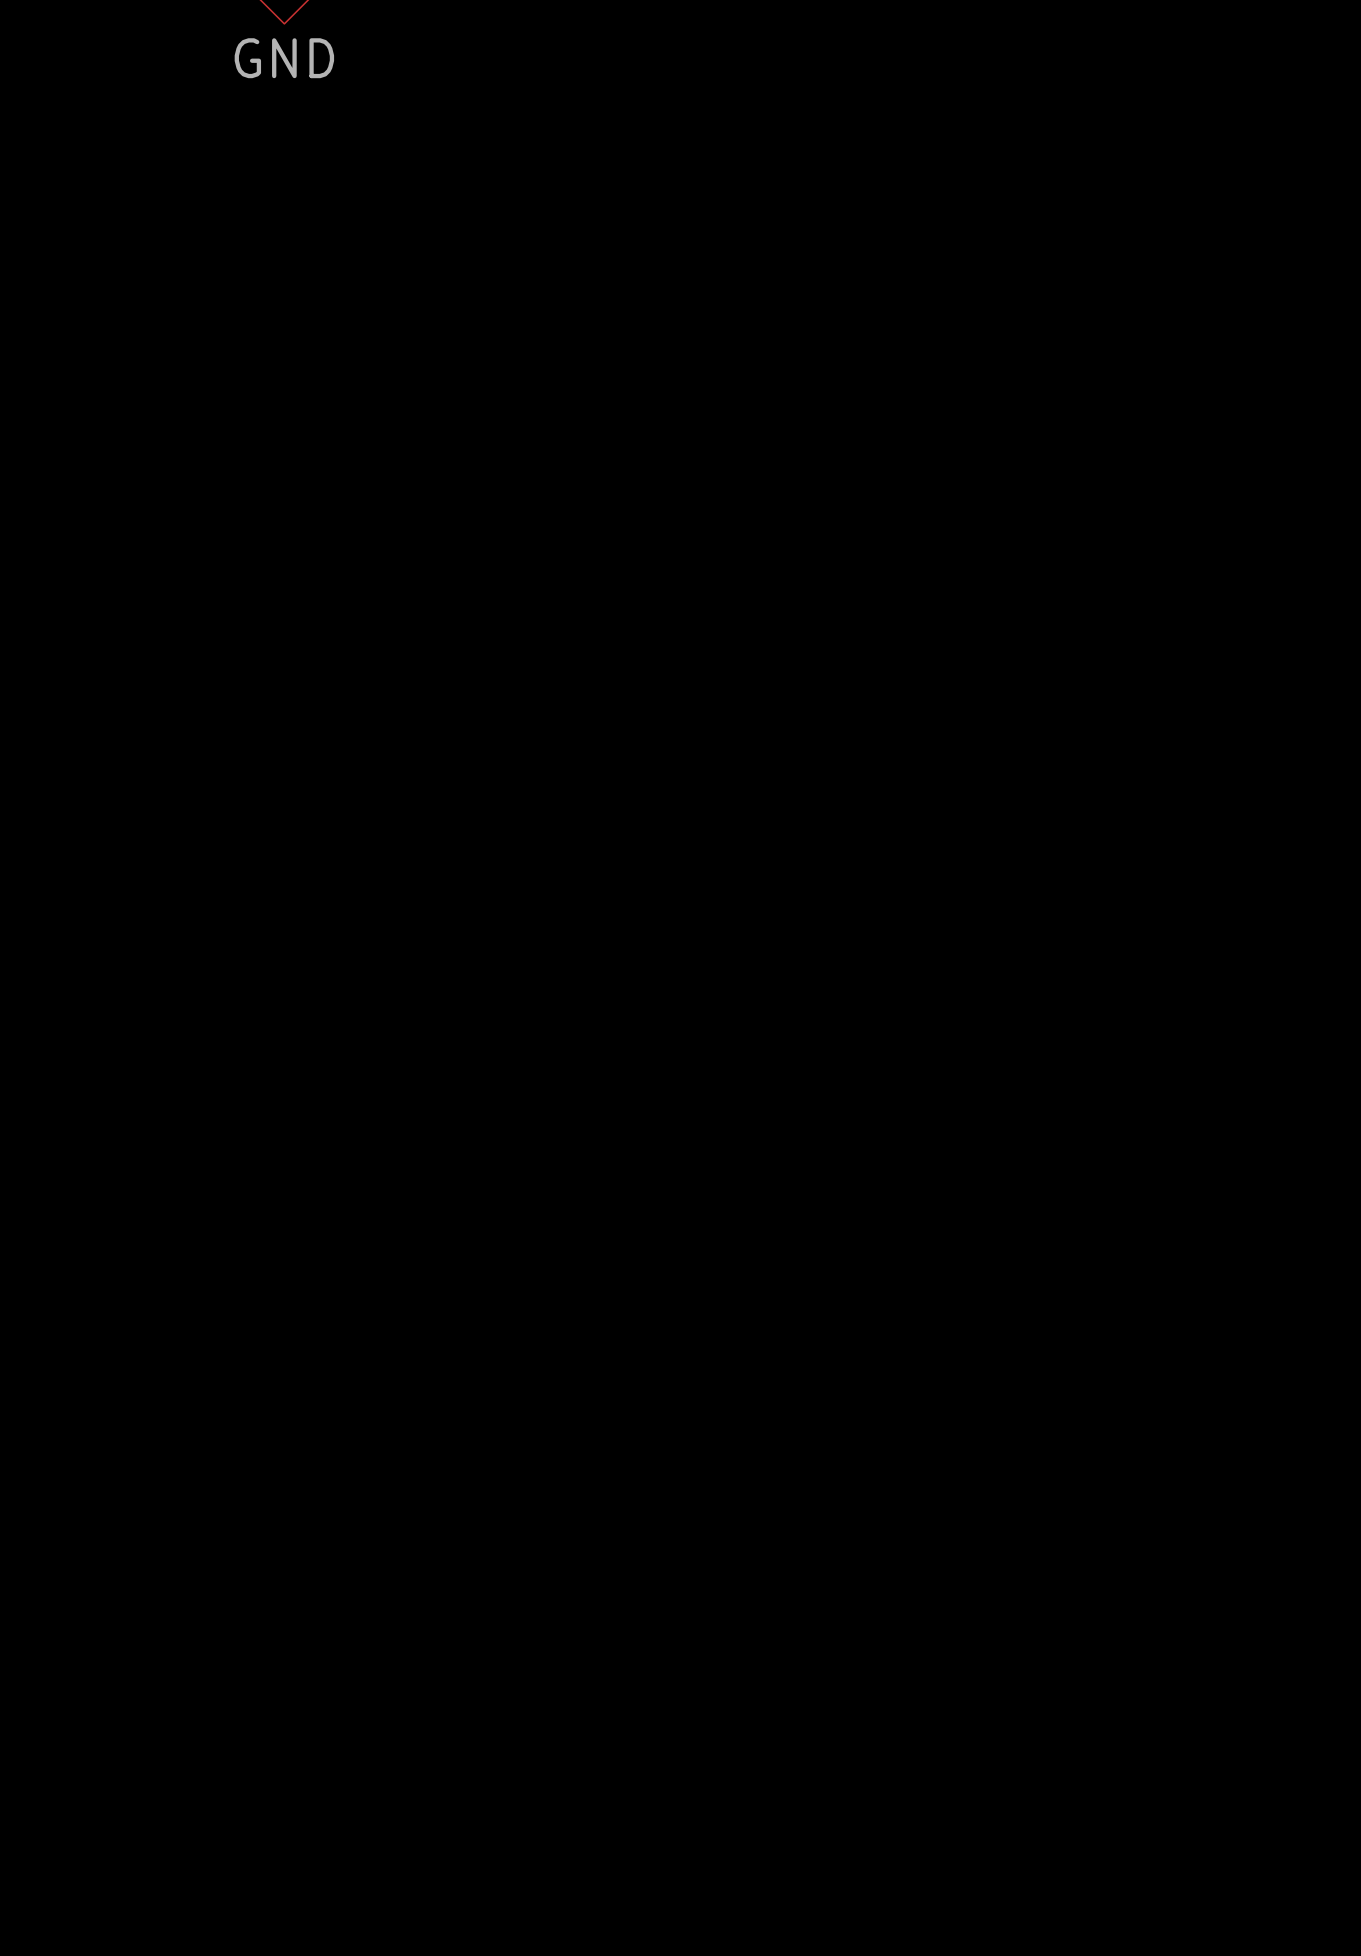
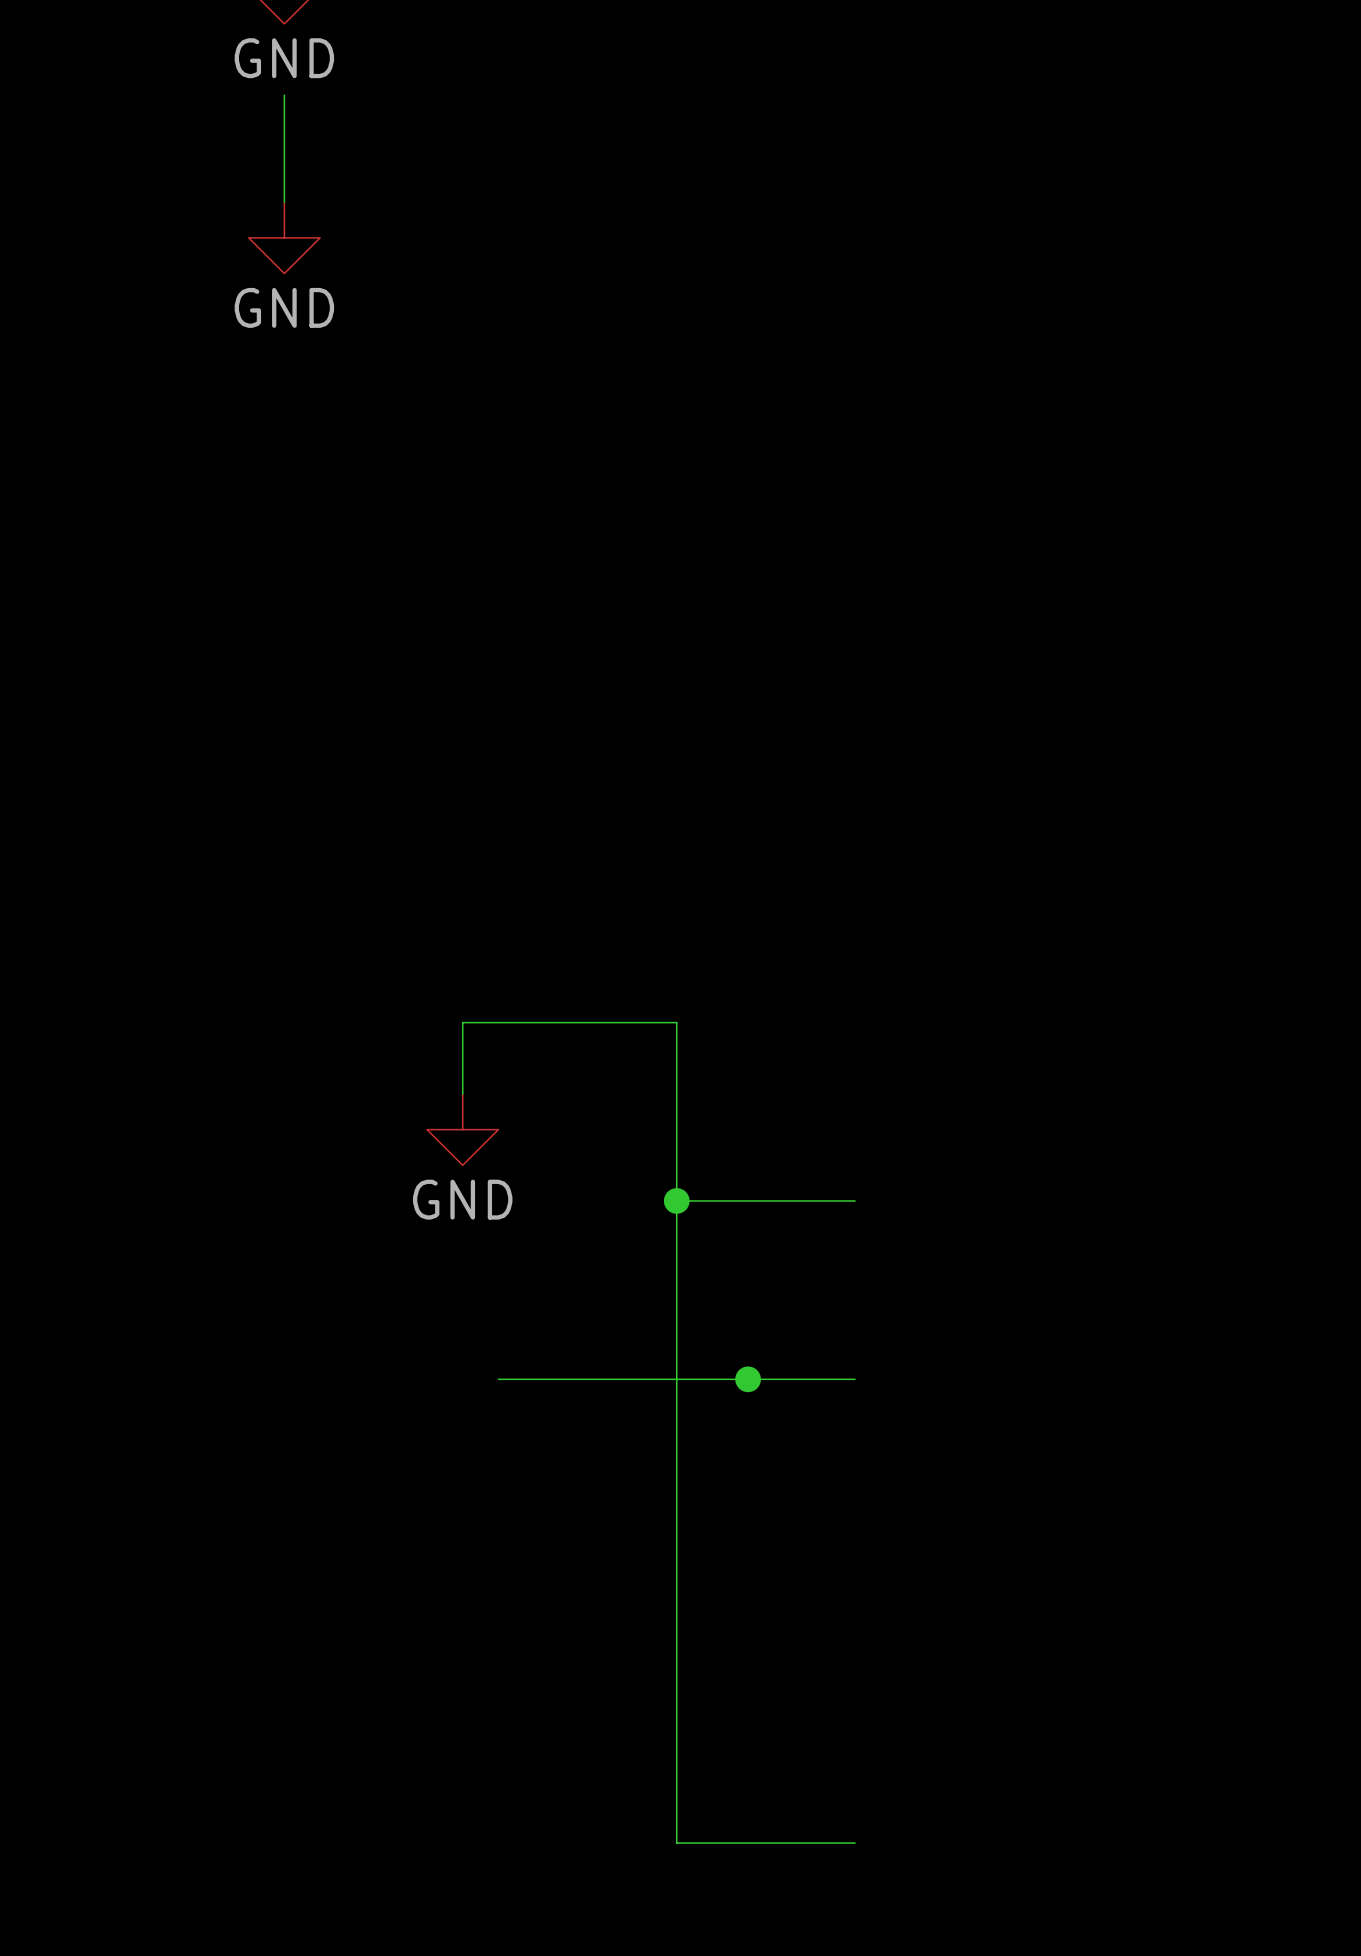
wire: none -> (284, 95) (284, 202)
power symbol: none -> GND (284, 237)
wire: none -> (462, 1093) (462, 1022) (676, 1022) (676, 1843) (855, 1843)
power symbol: none -> GND (462, 1129)
wire: none -> (676, 1200) (855, 1200)
junction: none -> (676, 1200)
wire: none -> (498, 1379) (855, 1379)
junction: none -> (748, 1379)

